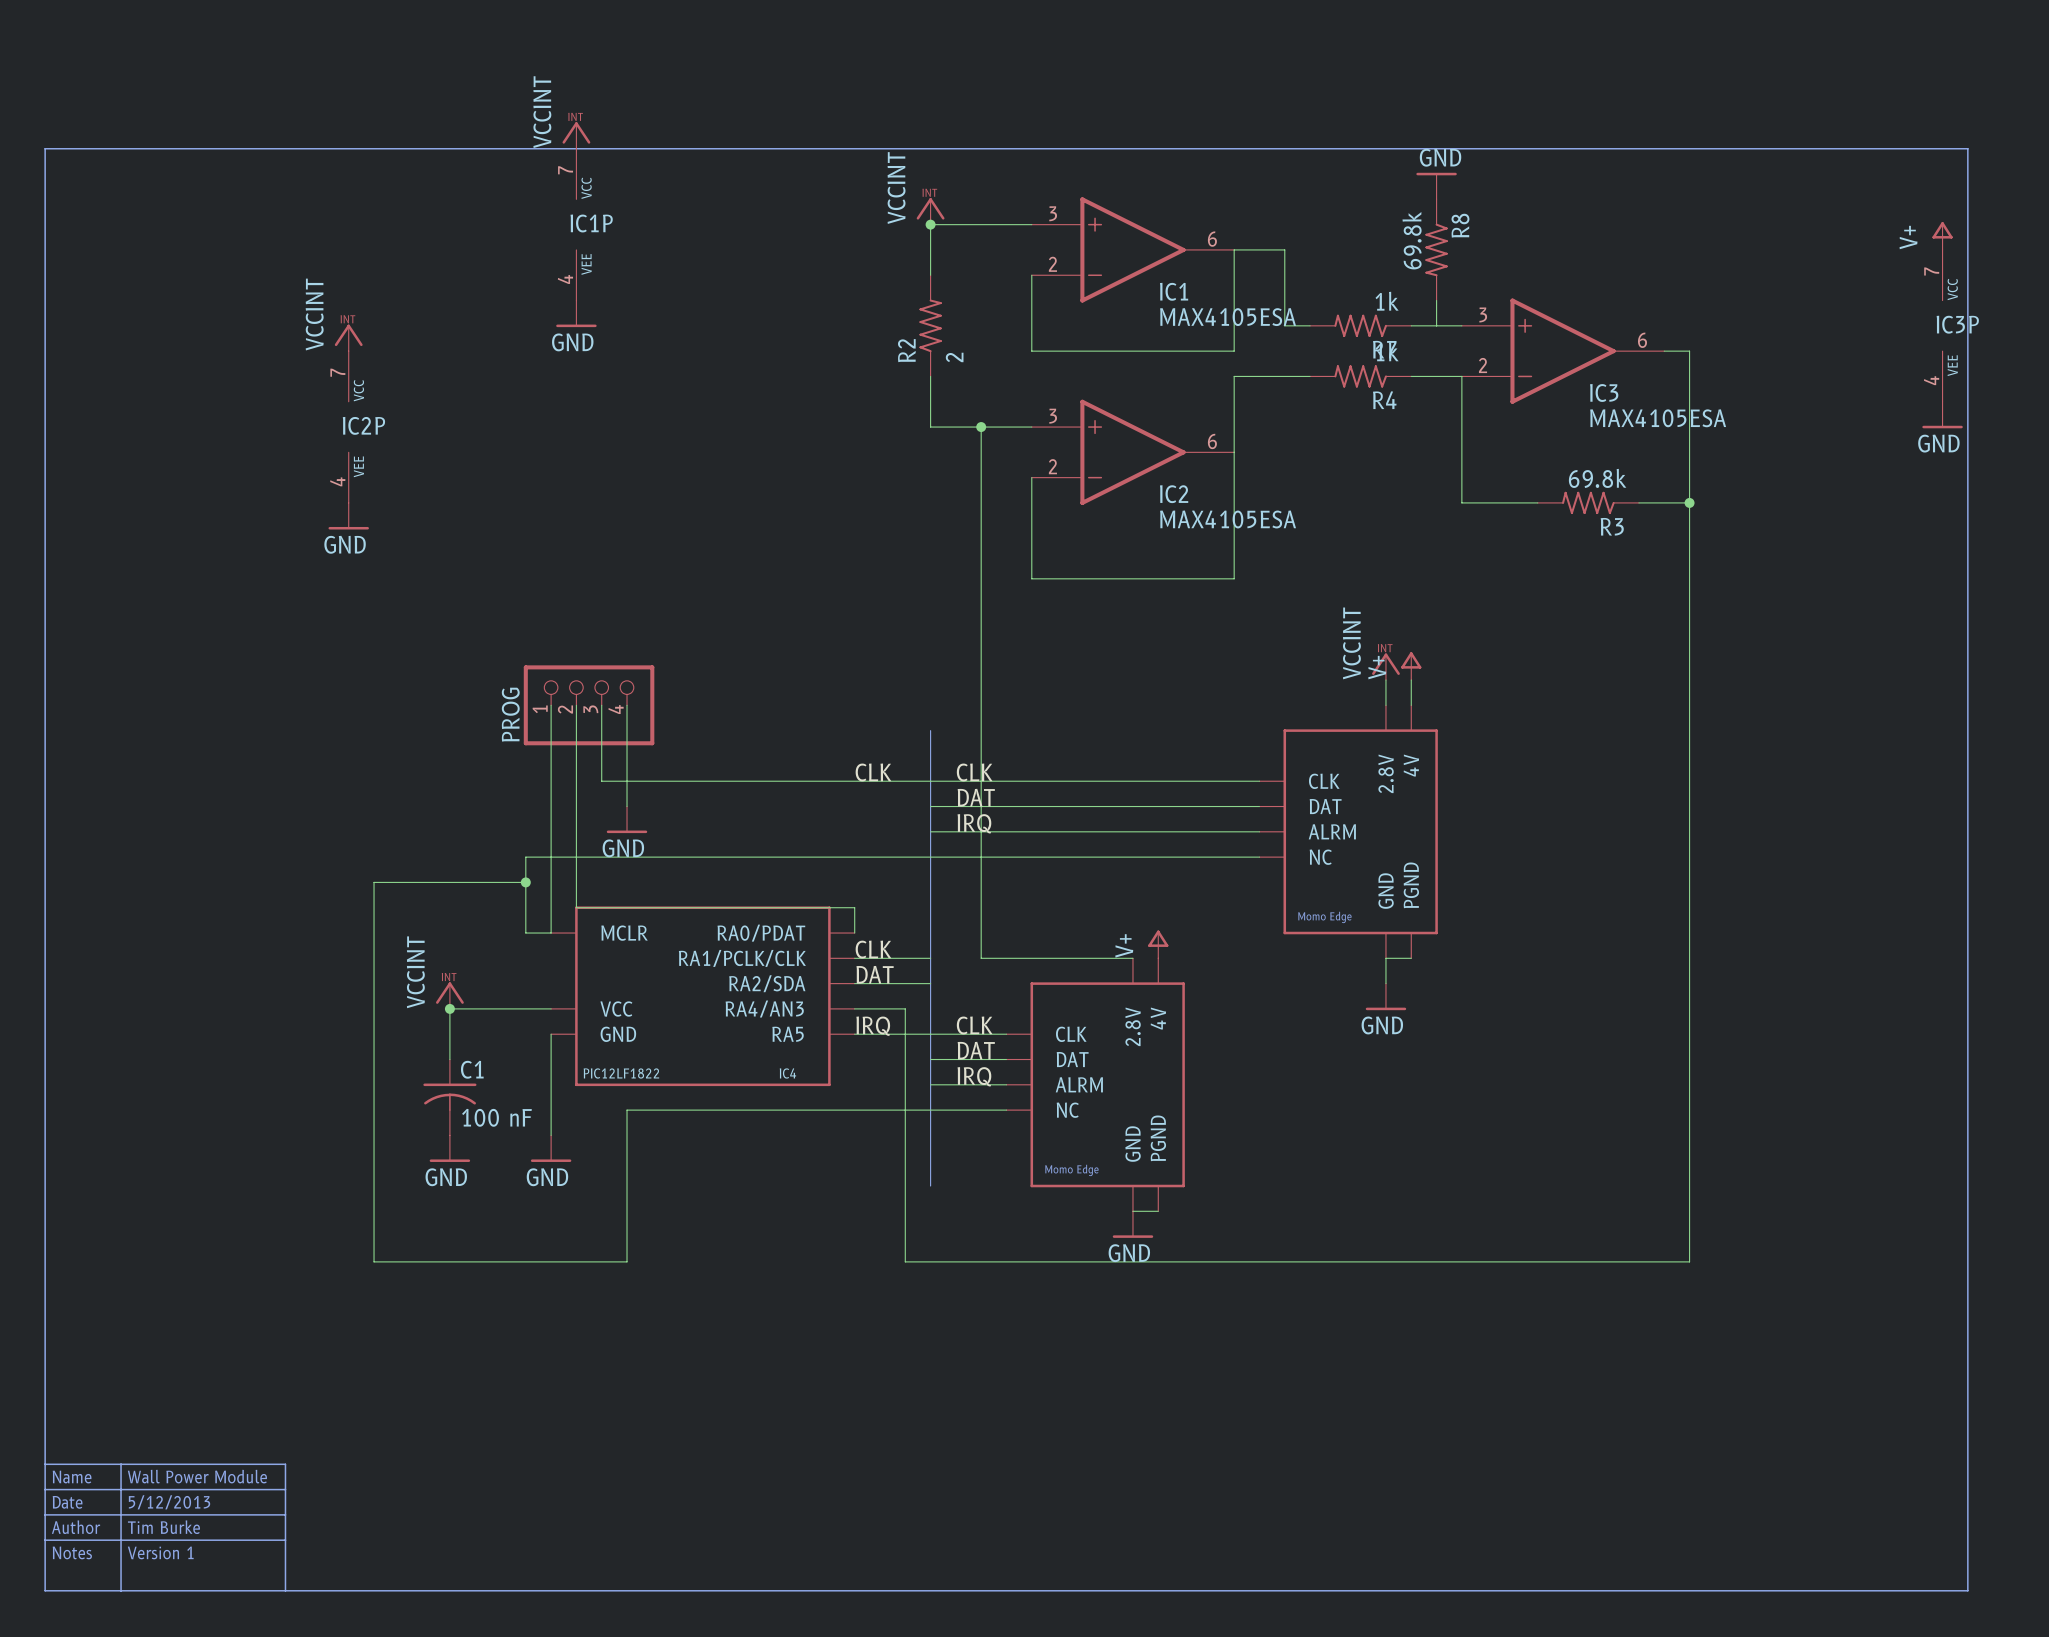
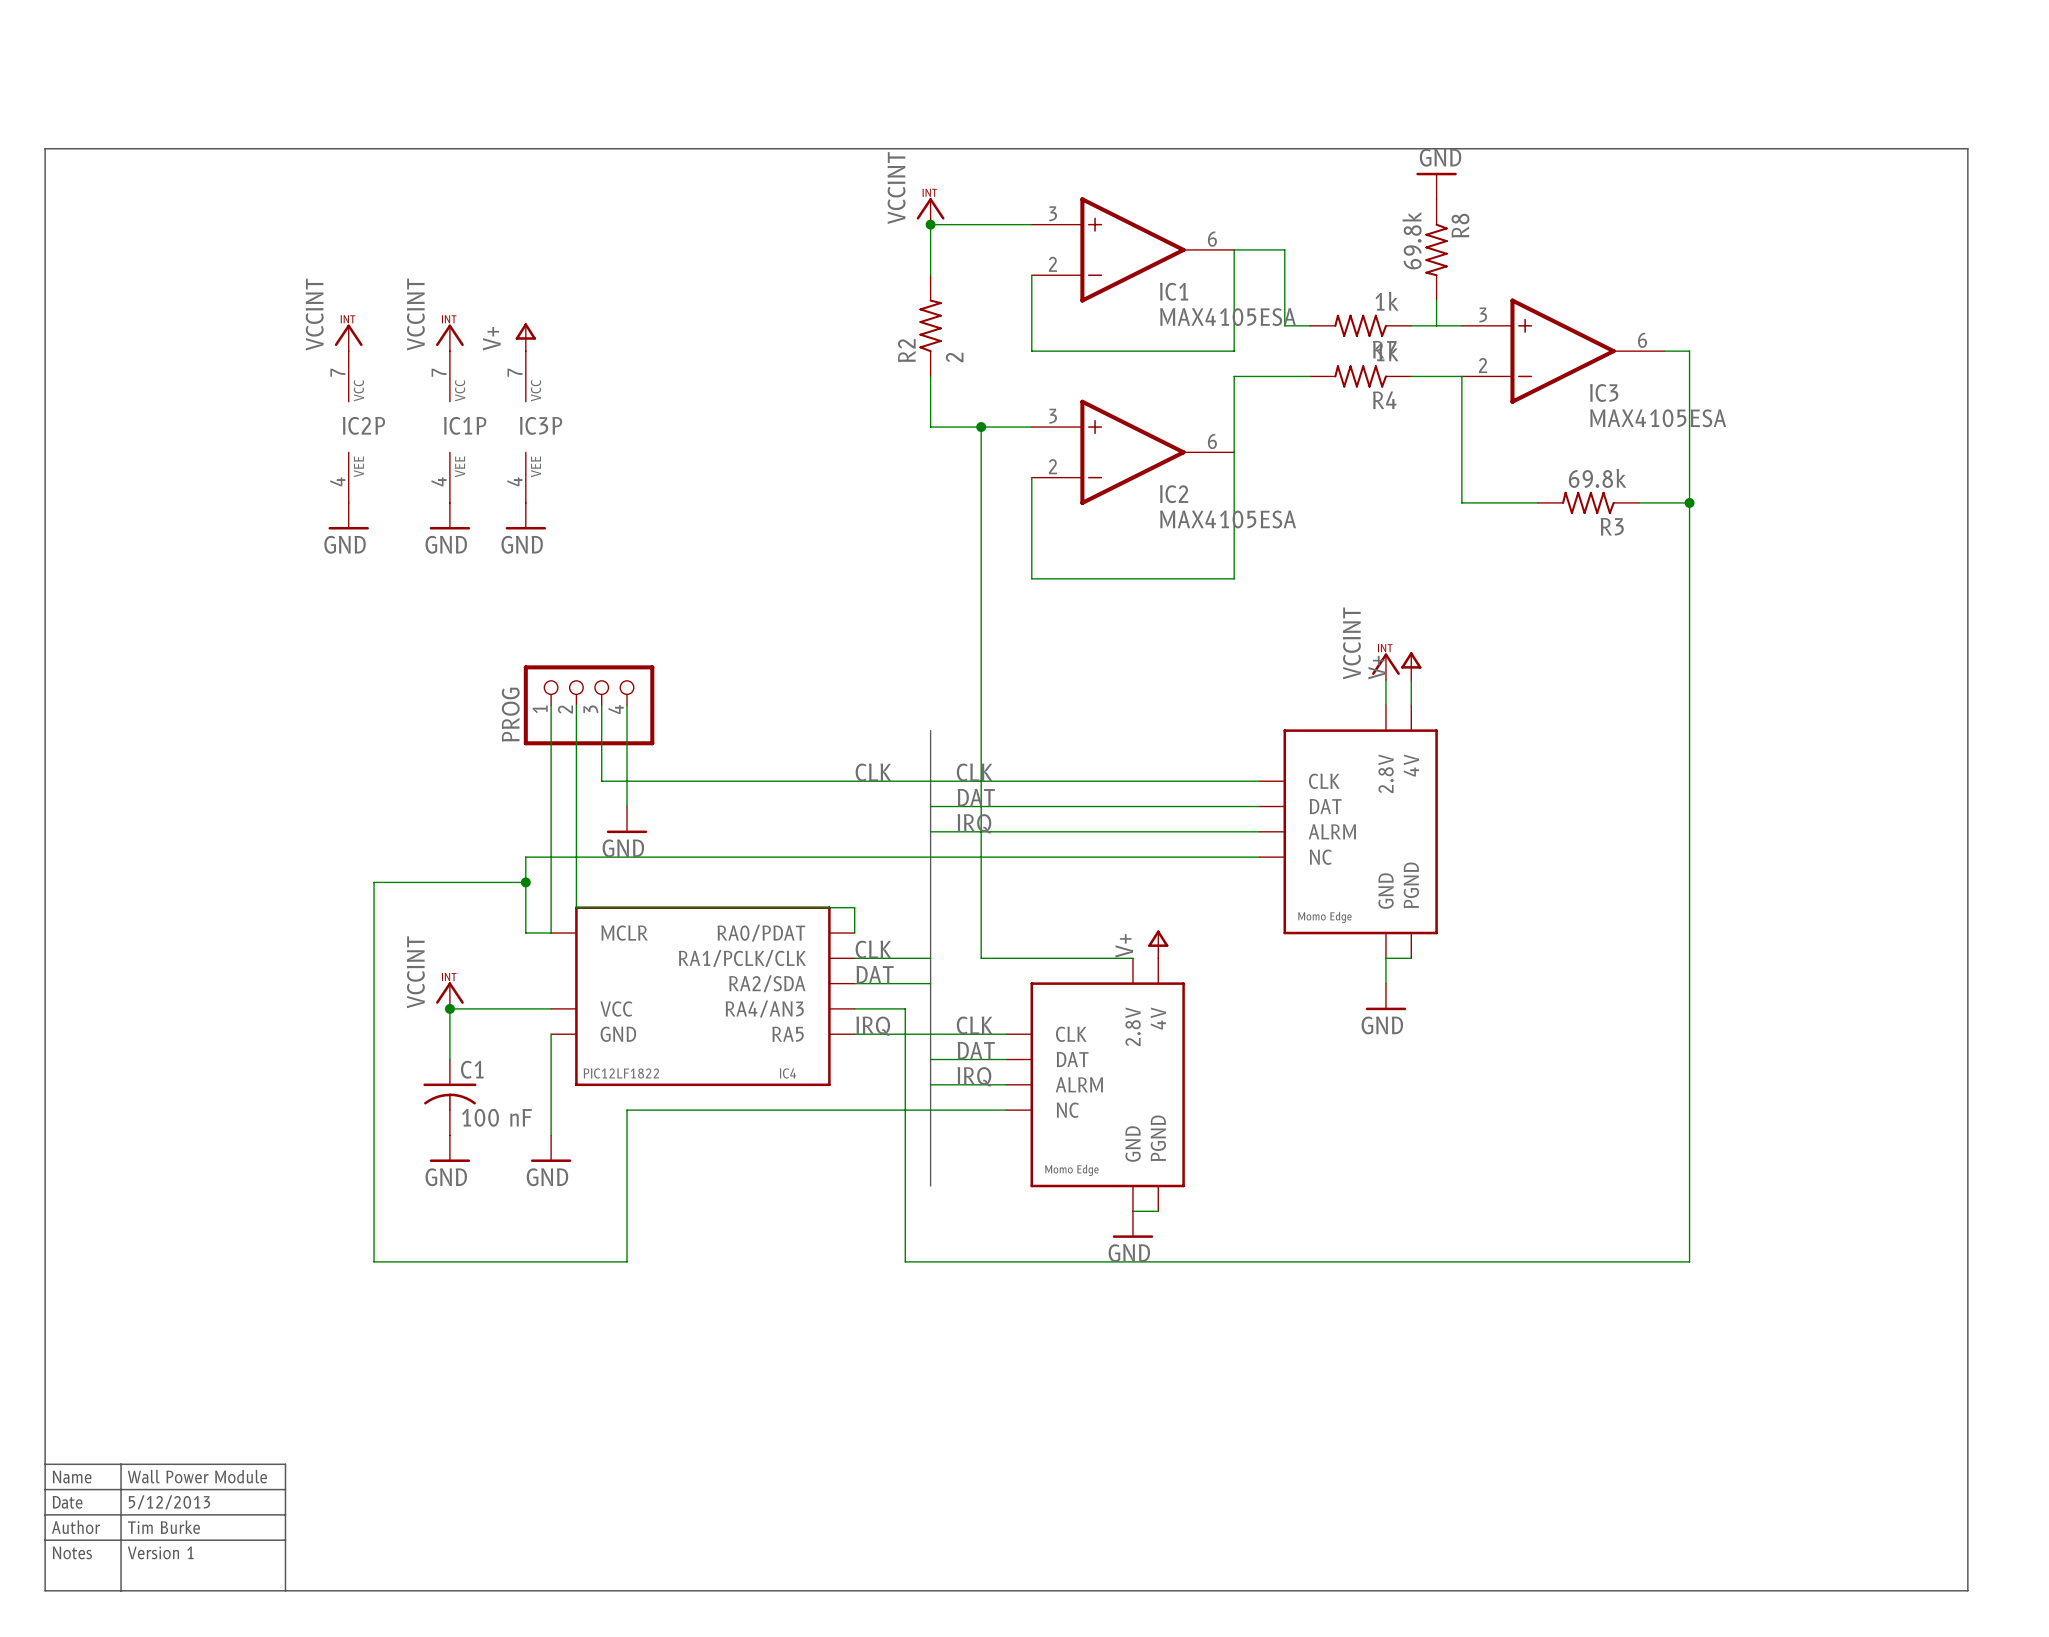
power symbol position: VCCINT (576, 135) -> VCCINT (449, 337)
IC1P position: (576, 224) -> (449, 427)
power symbol: V+ (1942, 236) -> none
power symbol: GND (576, 313) -> none
IC3P position: (1942, 325) -> (525, 427)
power symbol: none -> V+ (525, 337)
power symbol: GND (1942, 415) -> none
power symbol: none -> GND (449, 516)
power symbol: none -> GND (525, 516)

